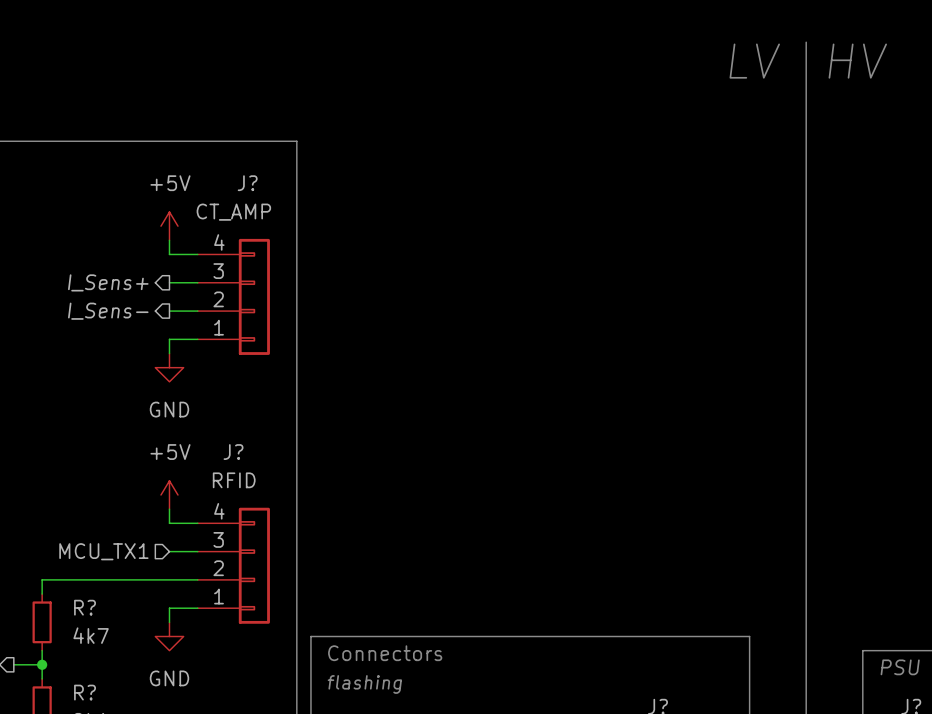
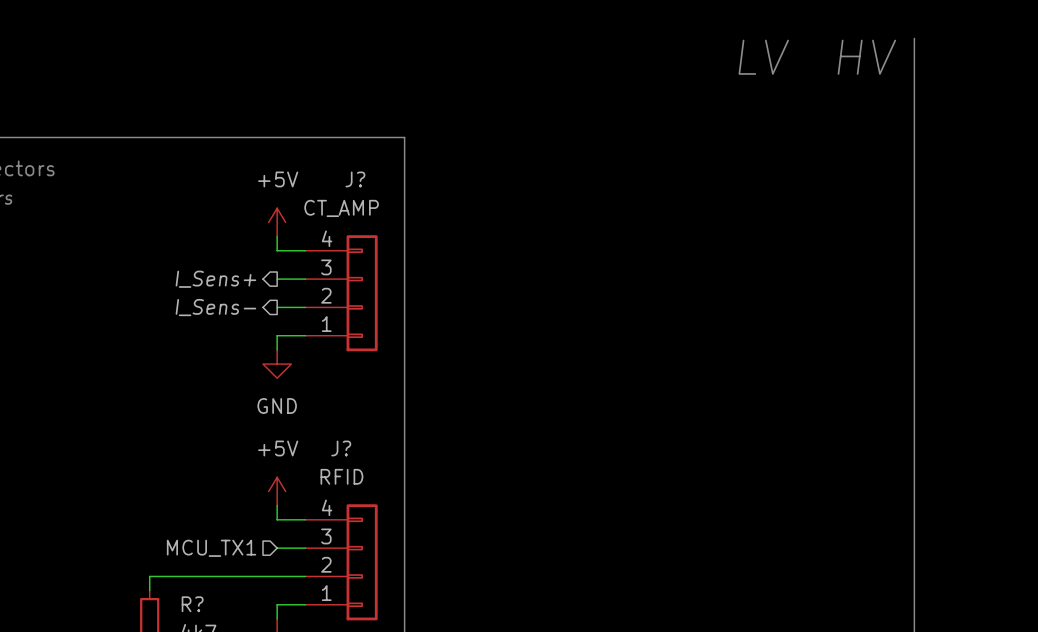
text: none -> LV (763, 57)
text: LV (754, 61) -> HV (866, 57)
text: HV (857, 61) -> none

